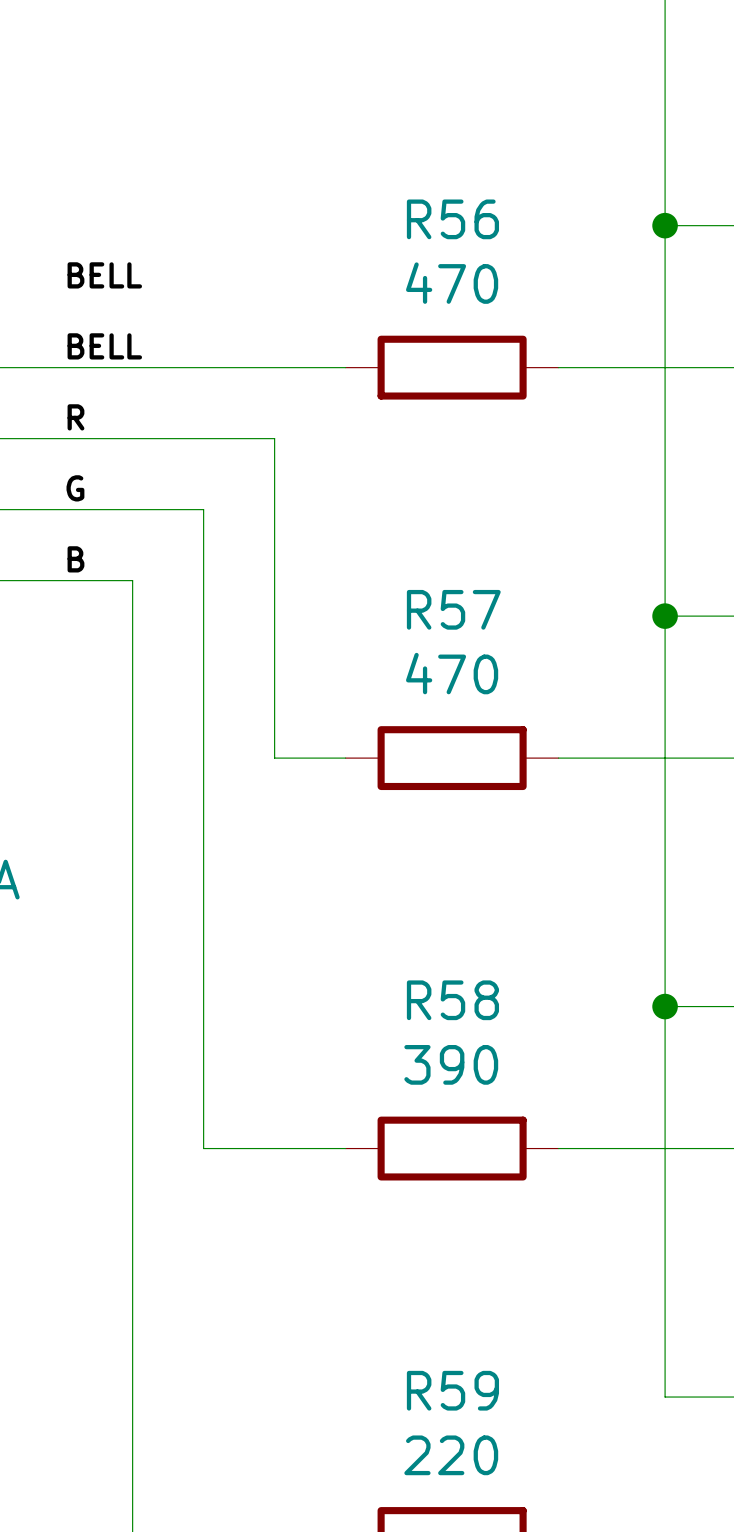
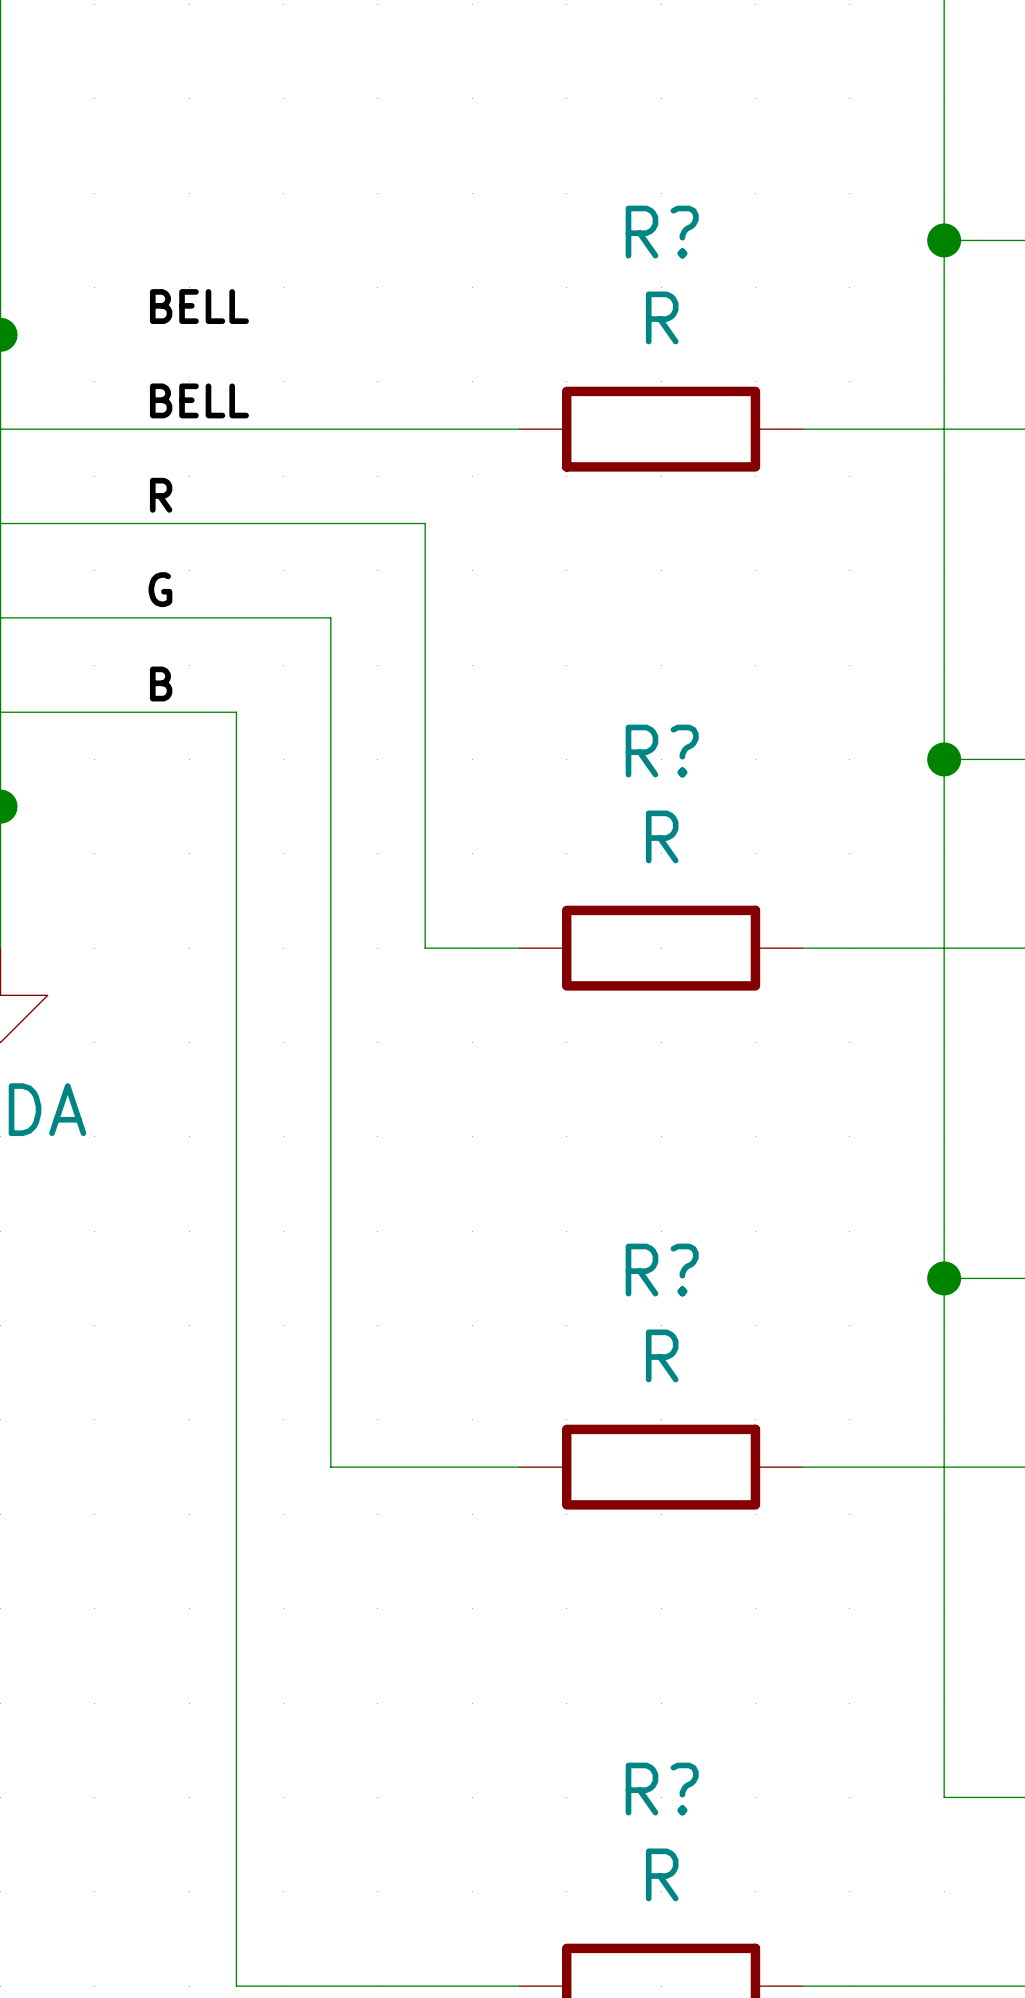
R56 name: R56 (452, 219) -> R? (662, 232)
R56 value: 470 (452, 283) -> R (662, 317)
R57 name: R57 (453, 609) -> R? (662, 751)
R57 value: 470 (452, 673) -> R (662, 836)
R58 name: R58 (452, 1000) -> R? (662, 1270)
R58 value: 390 (451, 1064) -> R (662, 1355)
R59 name: R59 (452, 1390) -> R? (662, 1789)
R59 value: 220 (451, 1455) -> R (662, 1874)

